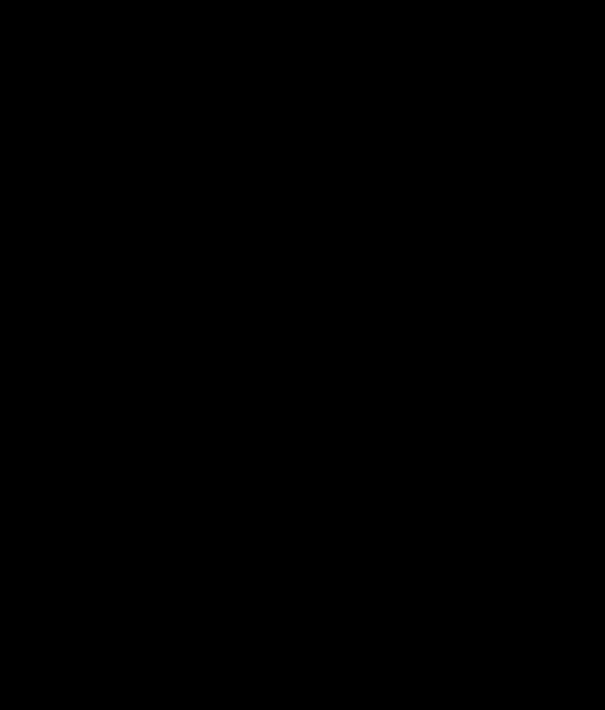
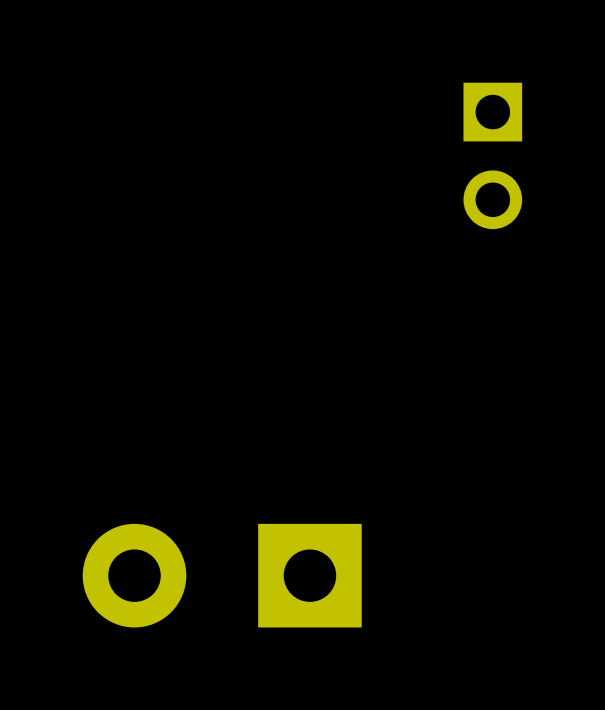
part: none -> (492, 155)
part: none -> (222, 575)

